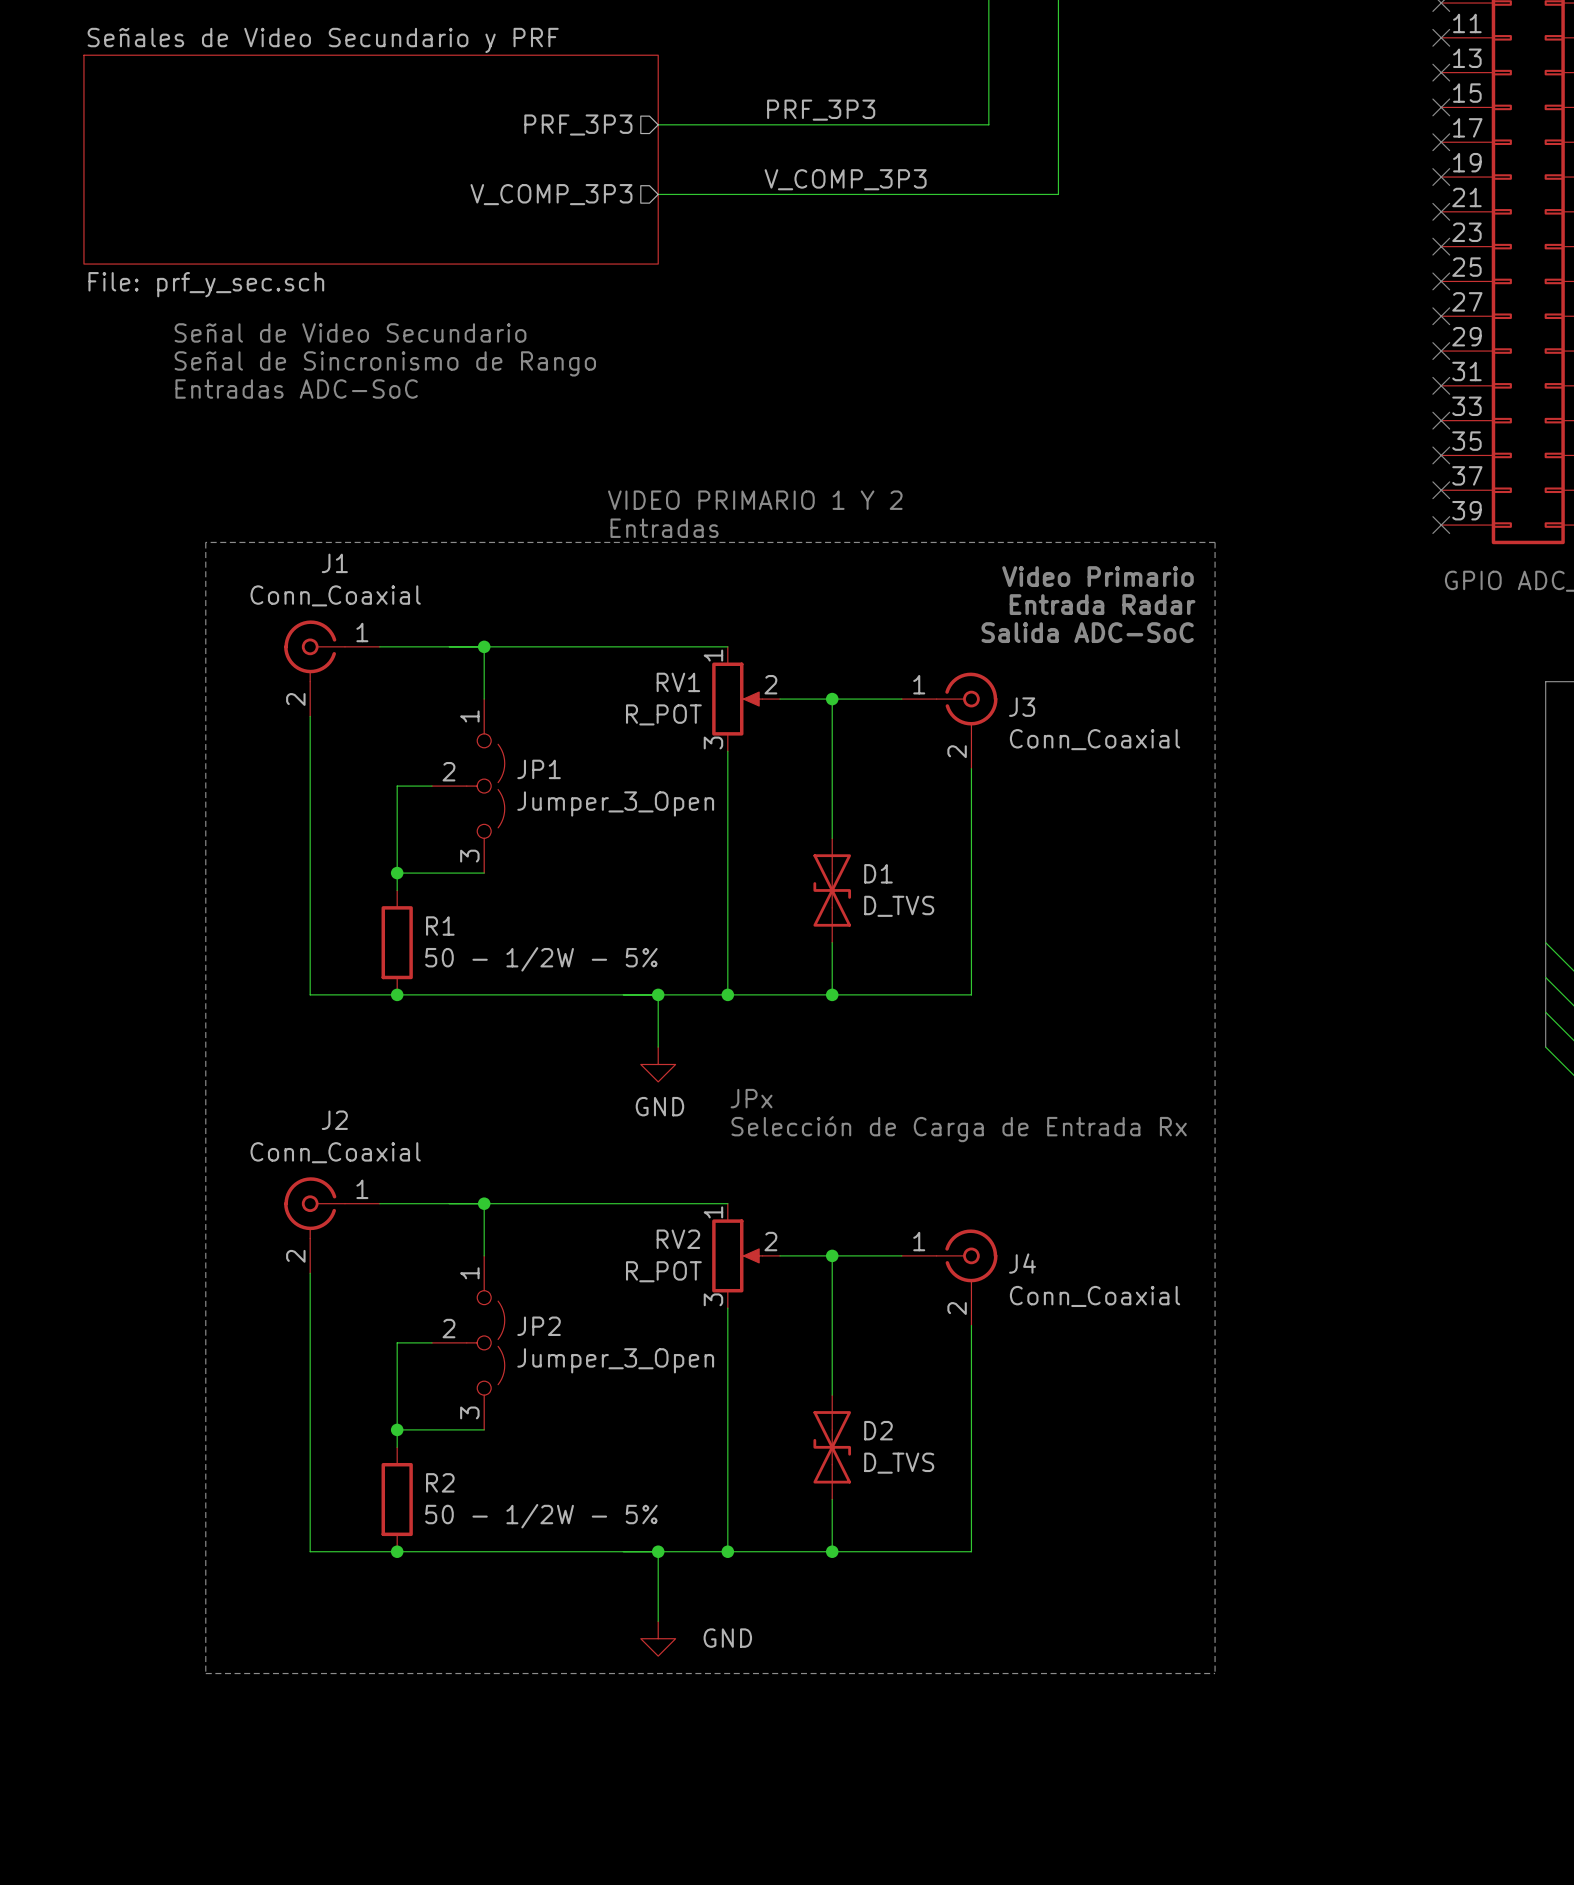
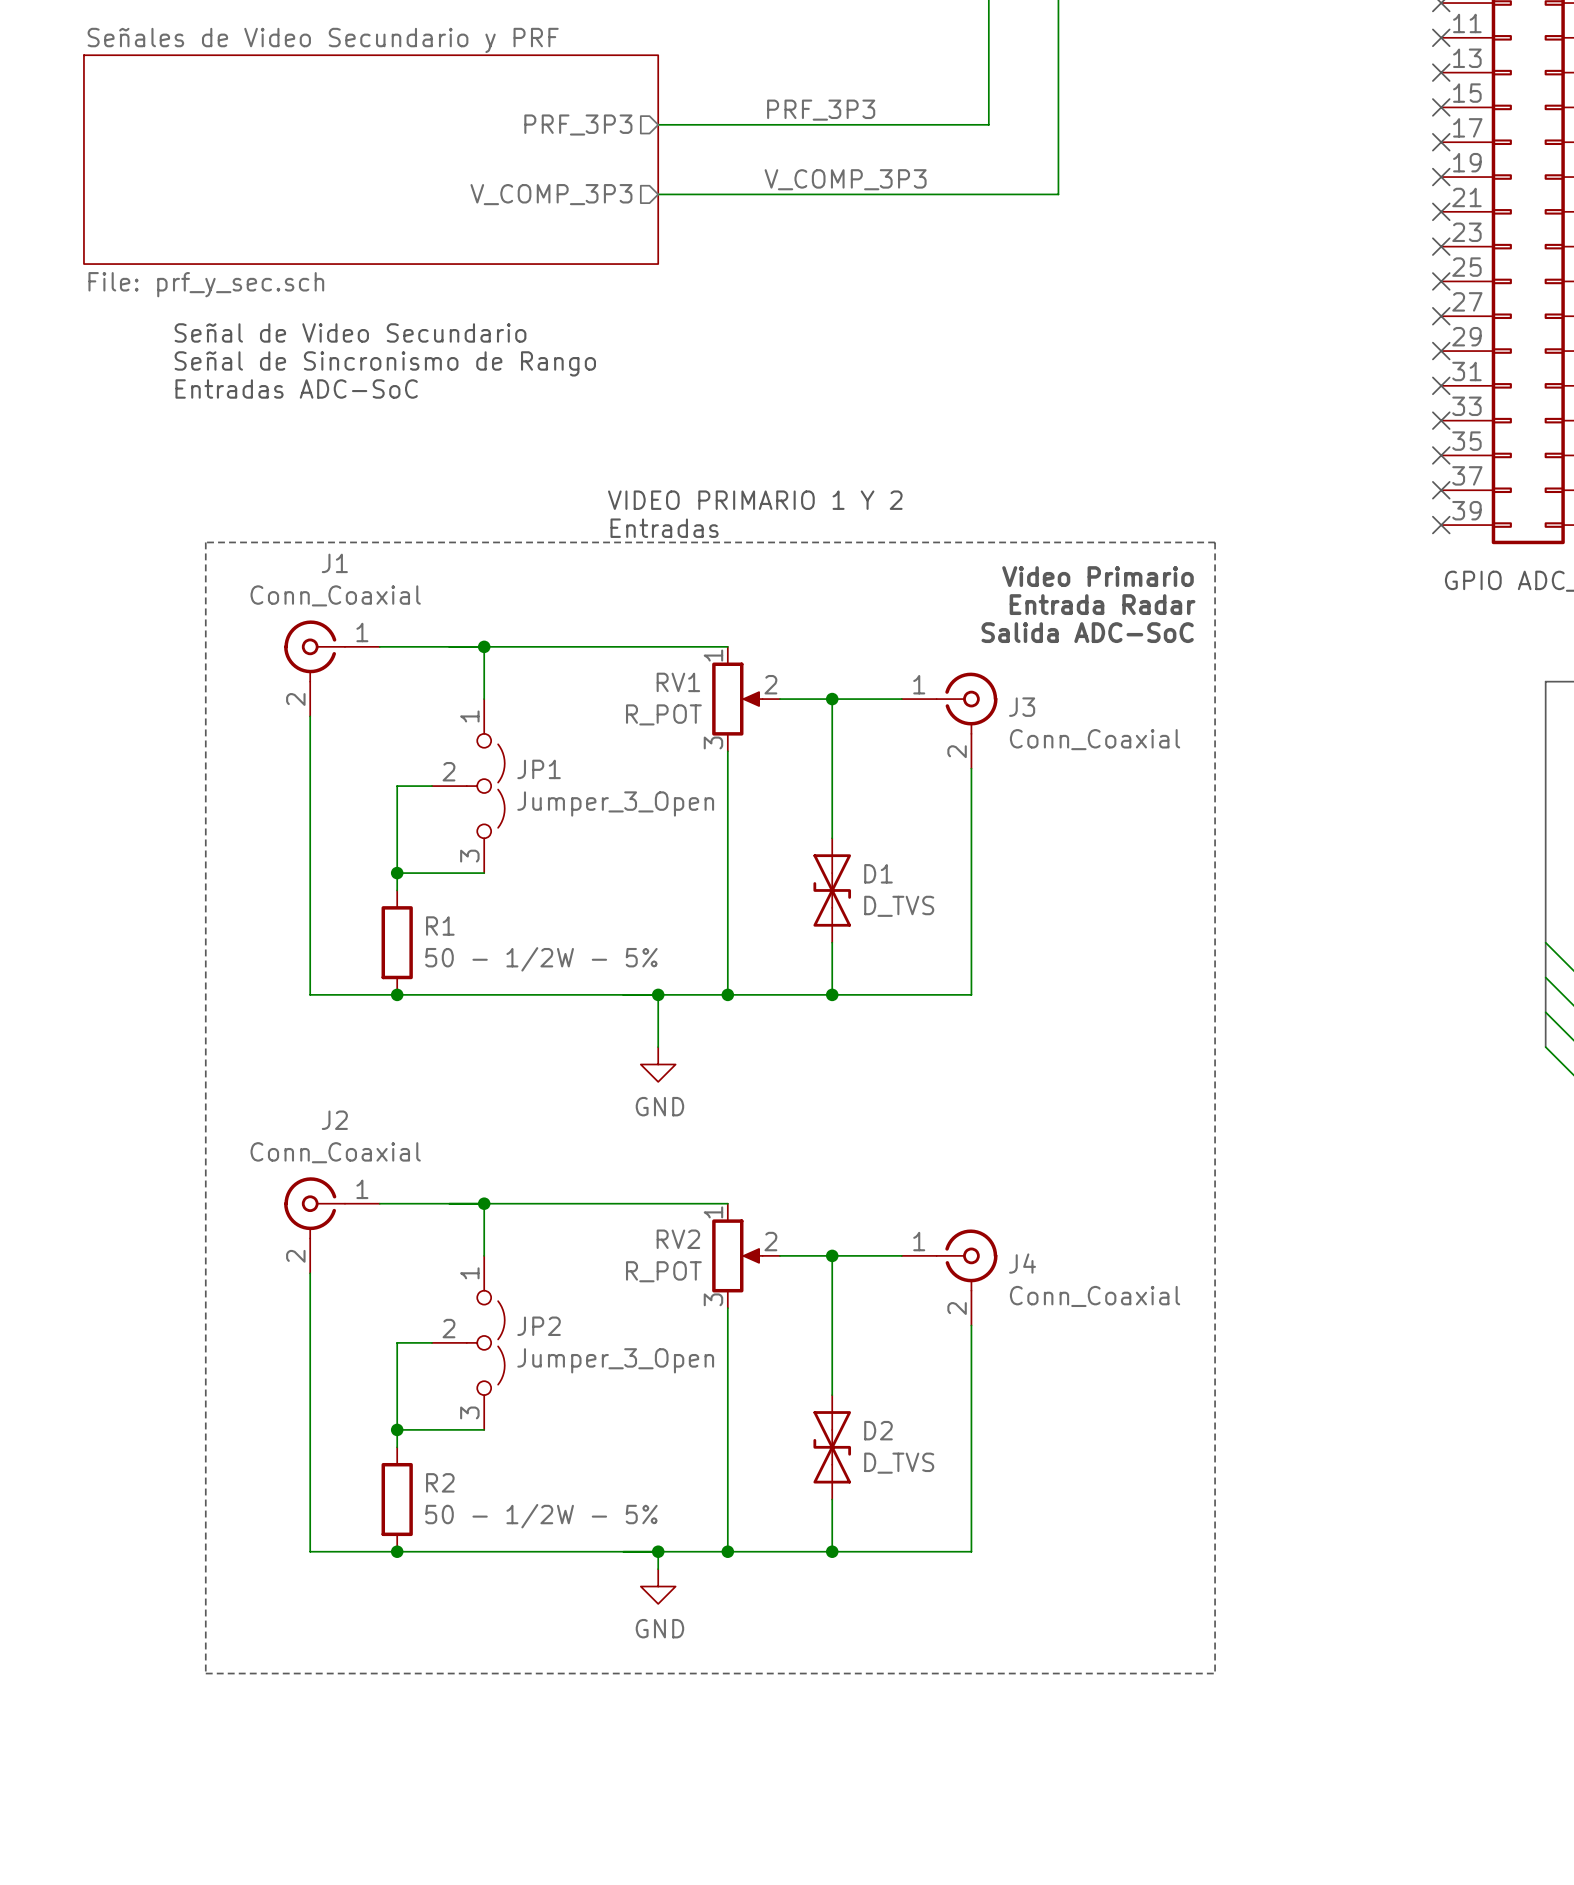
text: JPx (751, 1098) -> none
text: Selección de Carga de Entrada Rx (959, 1129) -> none
wire: (658, 1569) (658, 1621) -> none
power symbol position: GND (658, 1638) -> GND (658, 1586)
power symbol text position: GND (727, 1638) -> GND (659, 1628)

